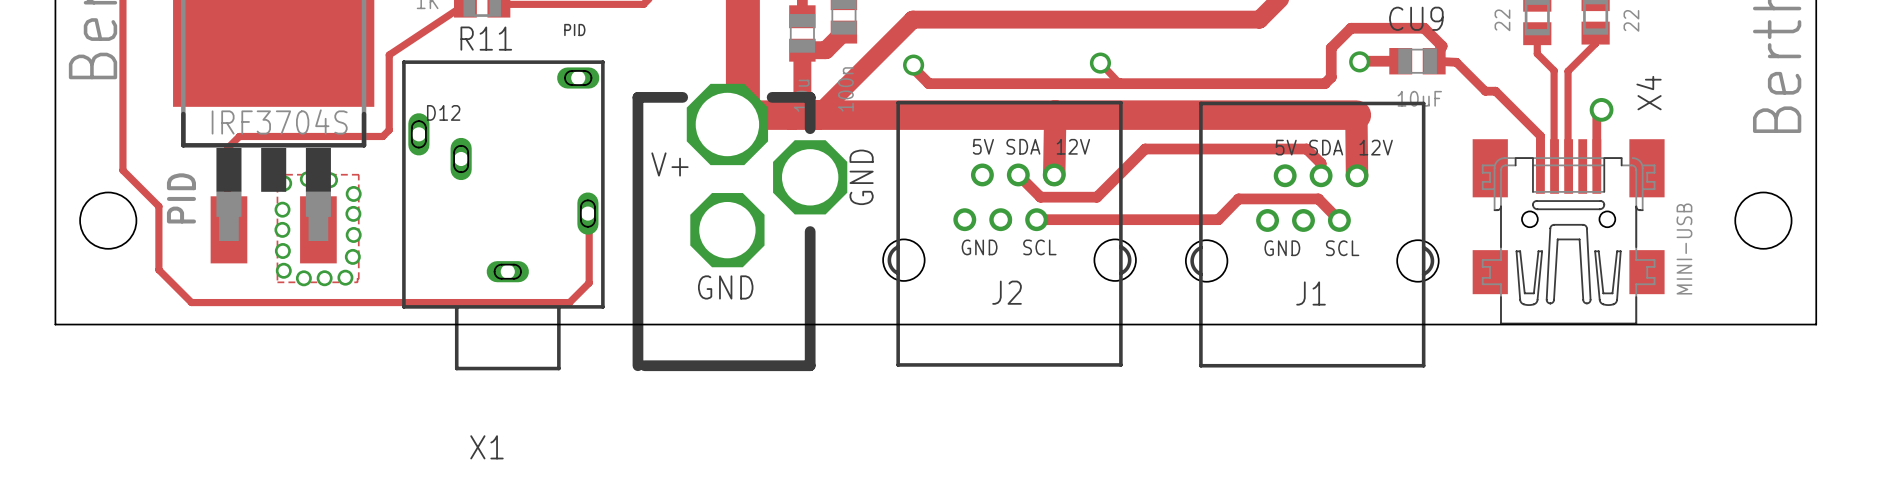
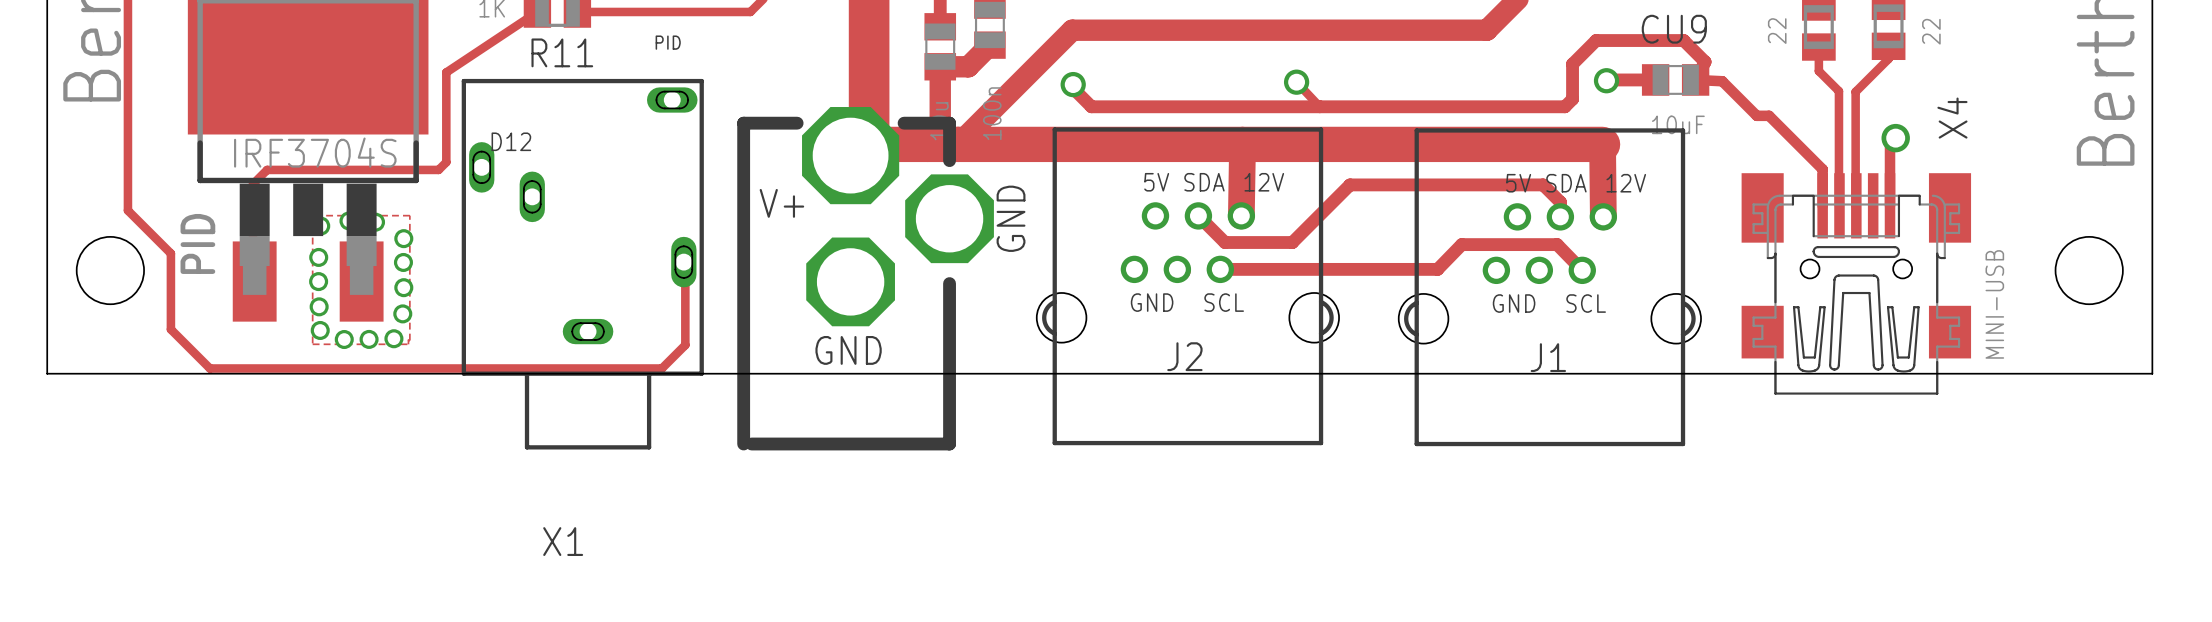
board edge: (55, 306) (55, 324) (1816, 324) (1816, 306) -> (47, 373) (2152, 373)

